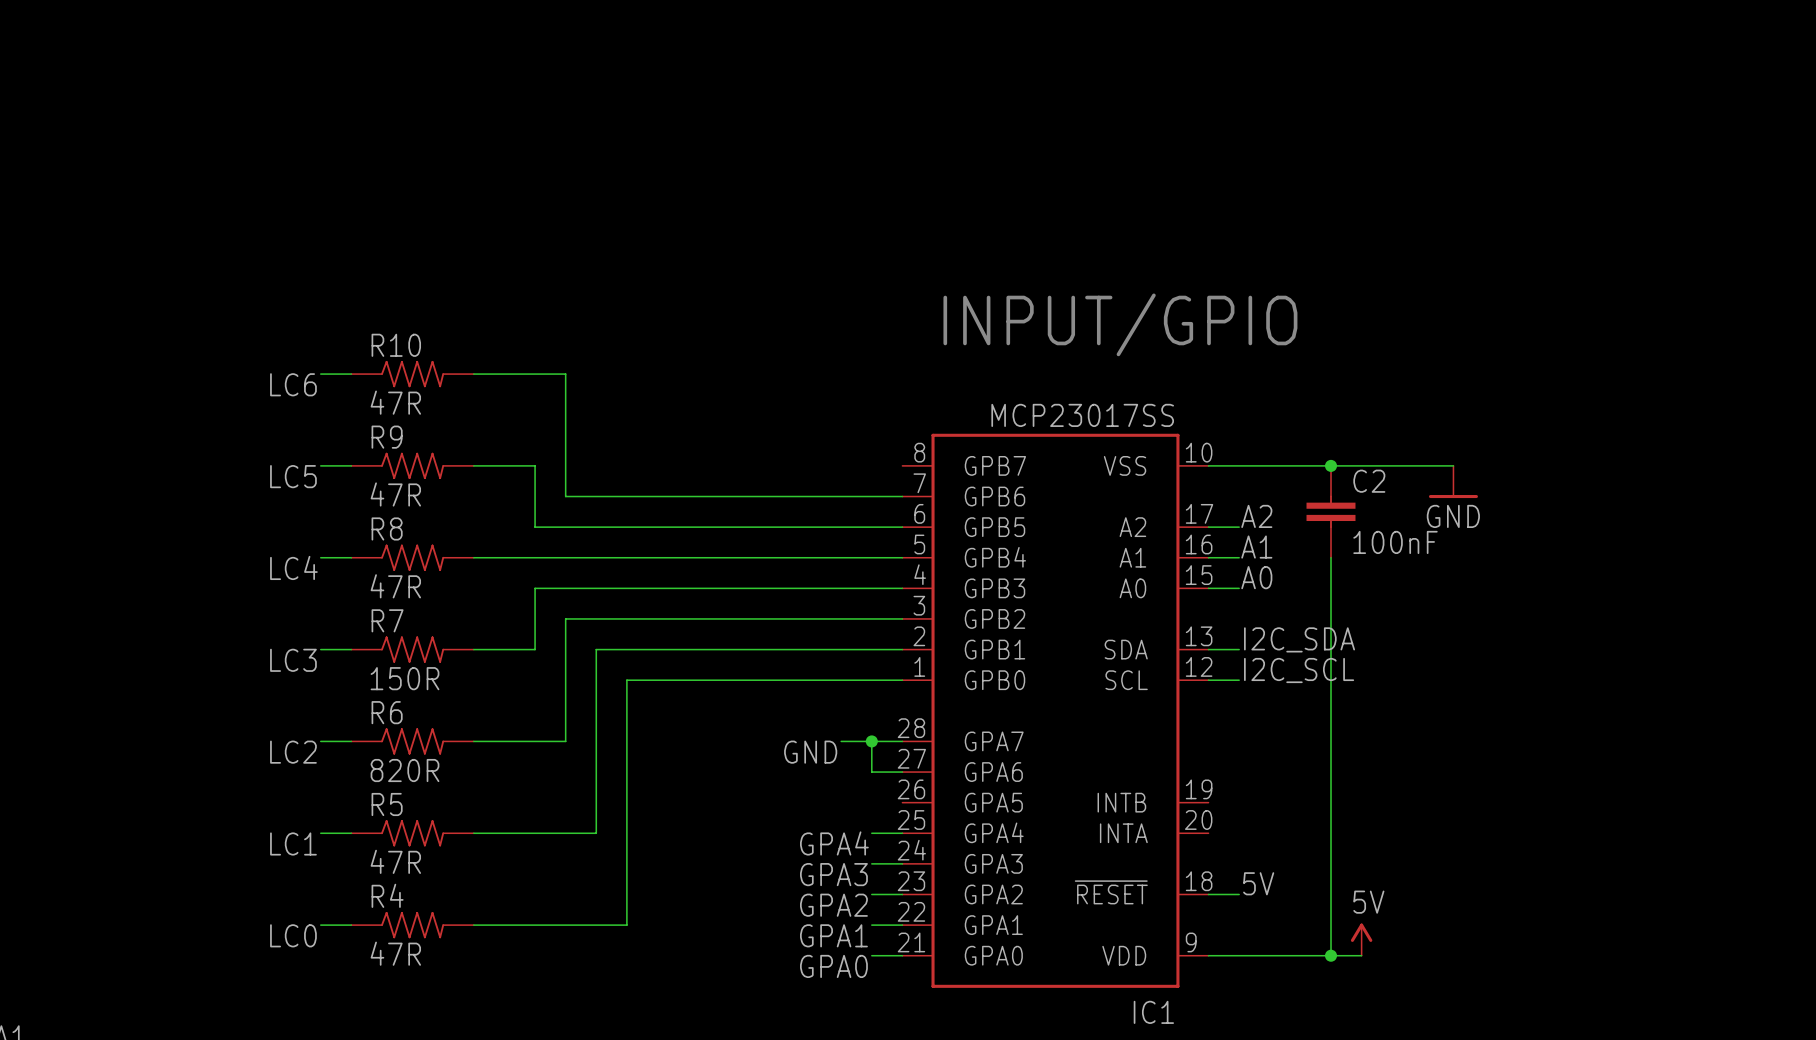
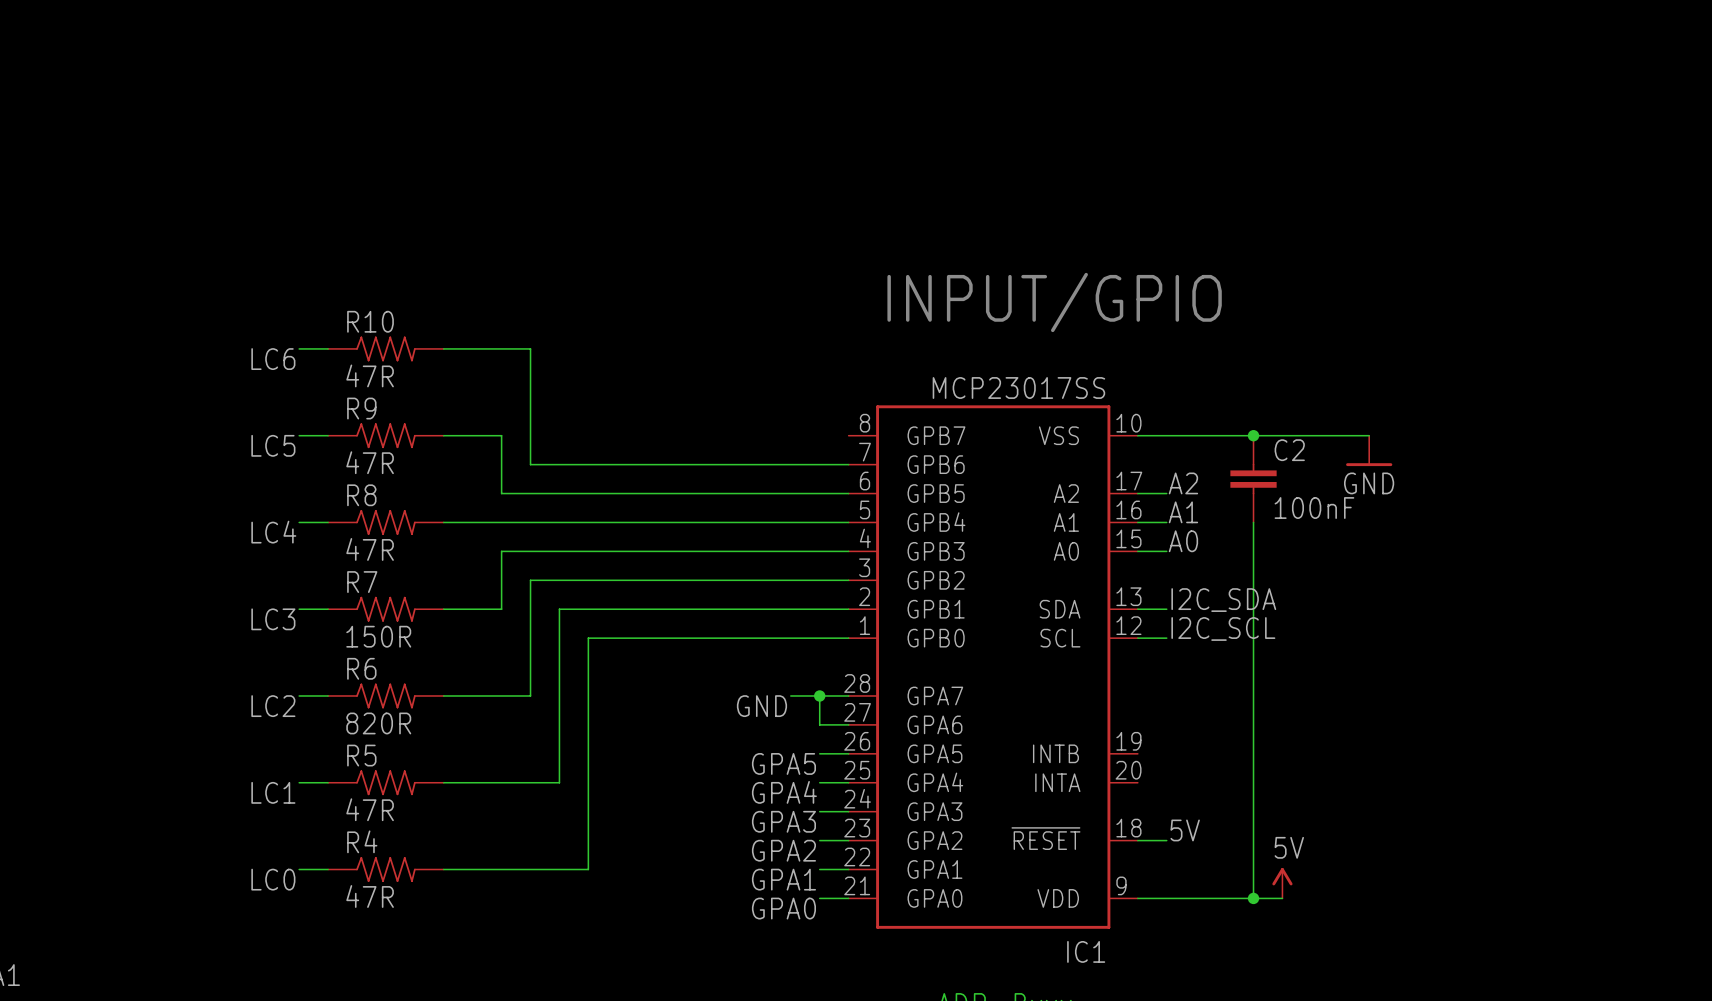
wire: none -> (819, 753) (848, 753)
label: none -> GPA5 (783, 763)

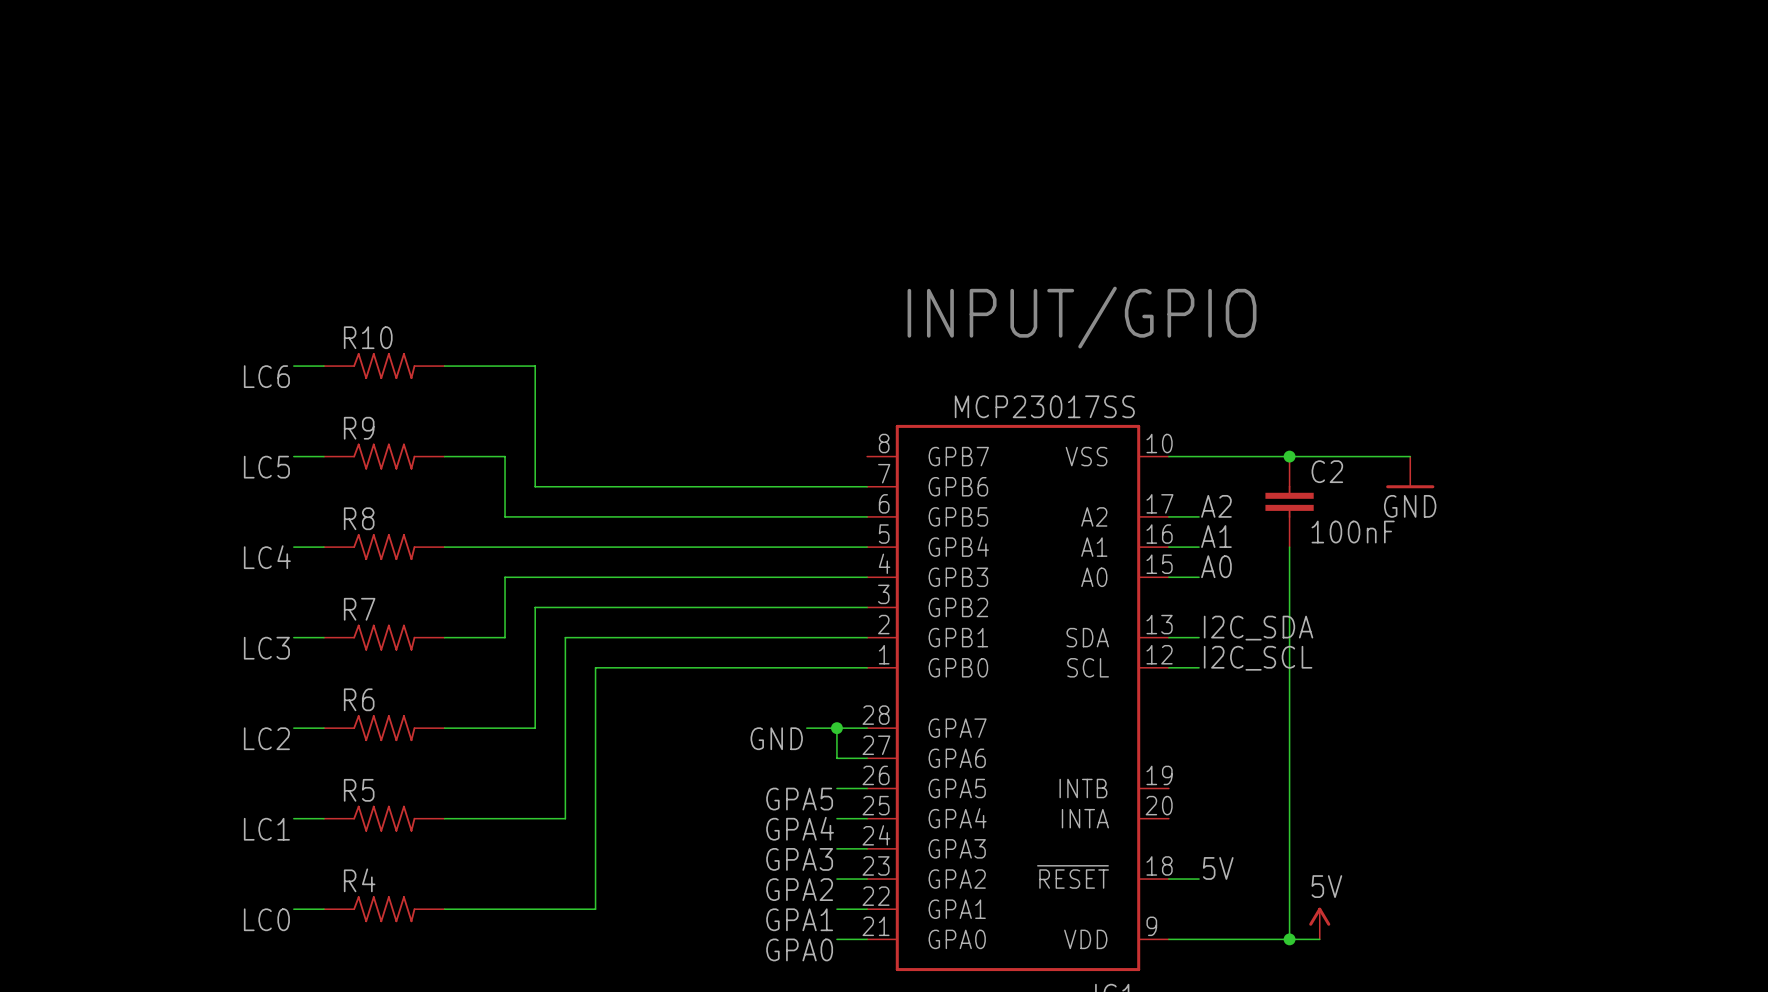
R10 value: 47R (370, 375) -> none
R9 value: 47R (370, 462) -> none
R8 value: 47R (370, 549) -> none
R7 value: 150R (378, 636) -> none
R6 value: 820R (378, 723) -> none
R5 value: 47R (370, 809) -> none
R4 value: 47R (370, 896) -> none

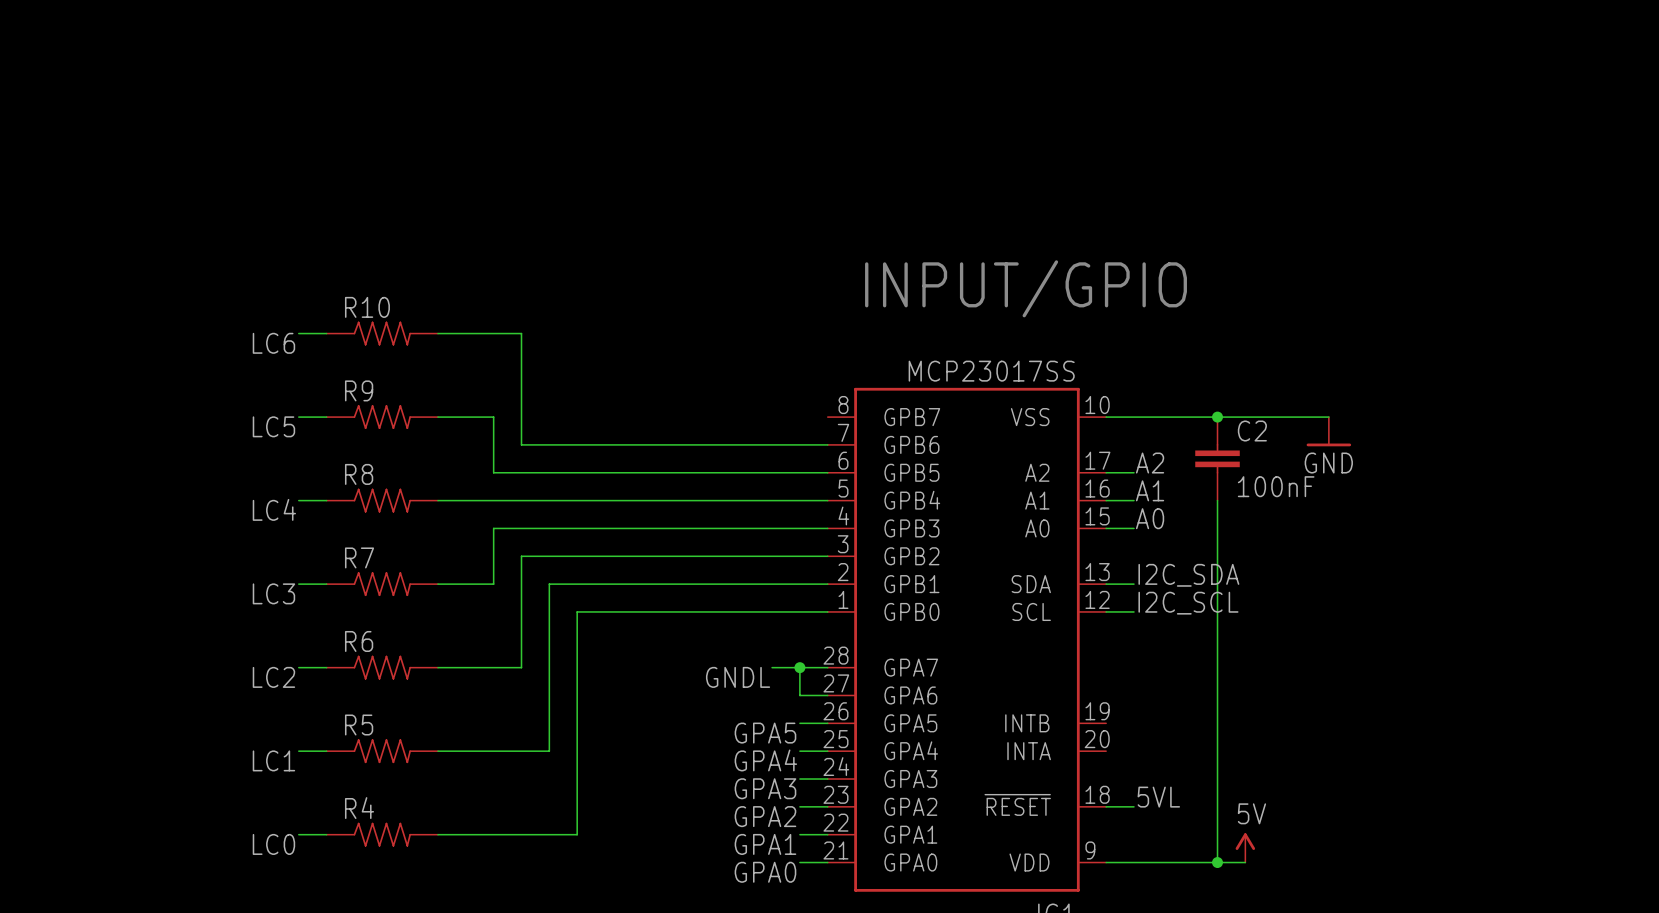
label: GND (776, 738) -> GNDL (738, 677)
label: 5V (1218, 868) -> 5VL (1158, 797)

